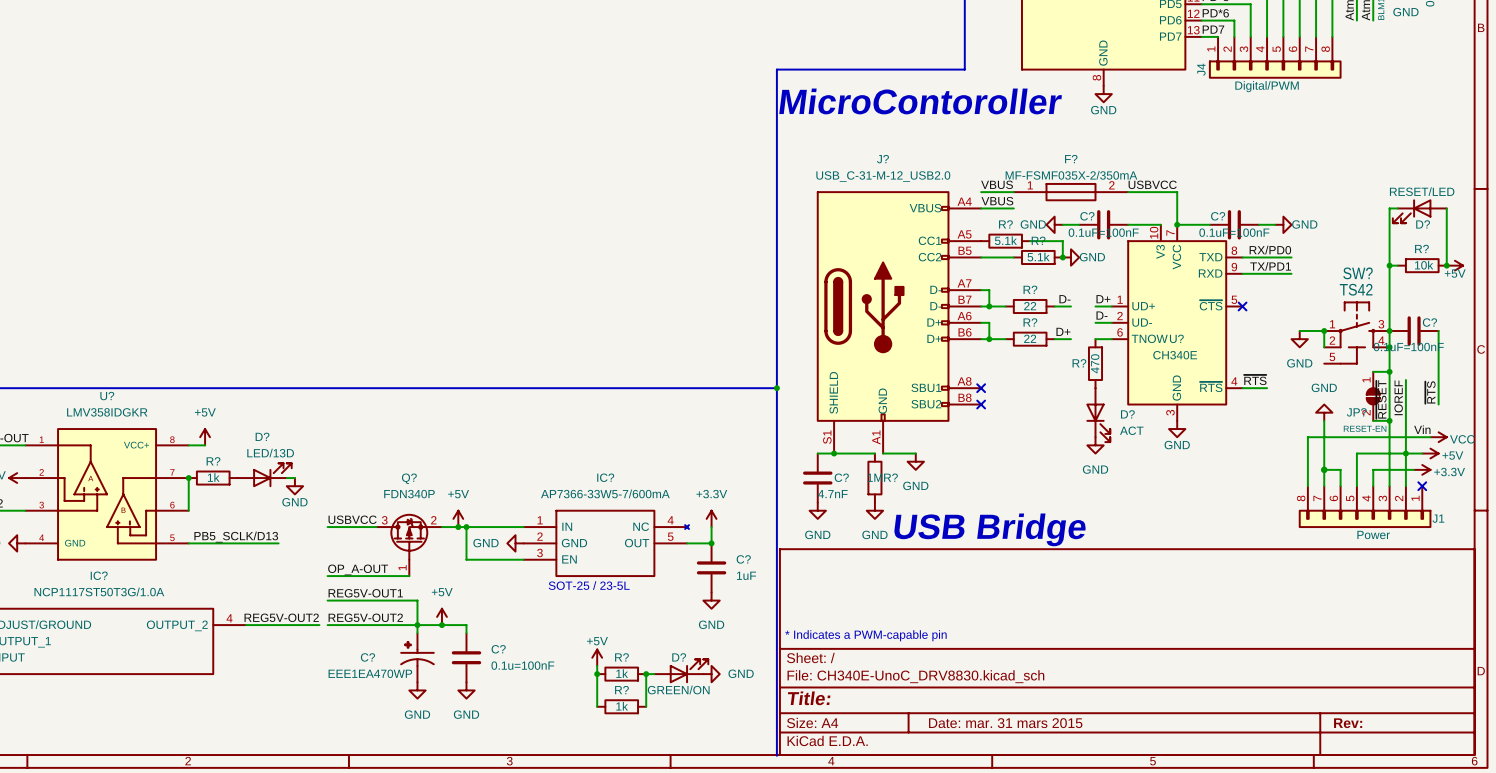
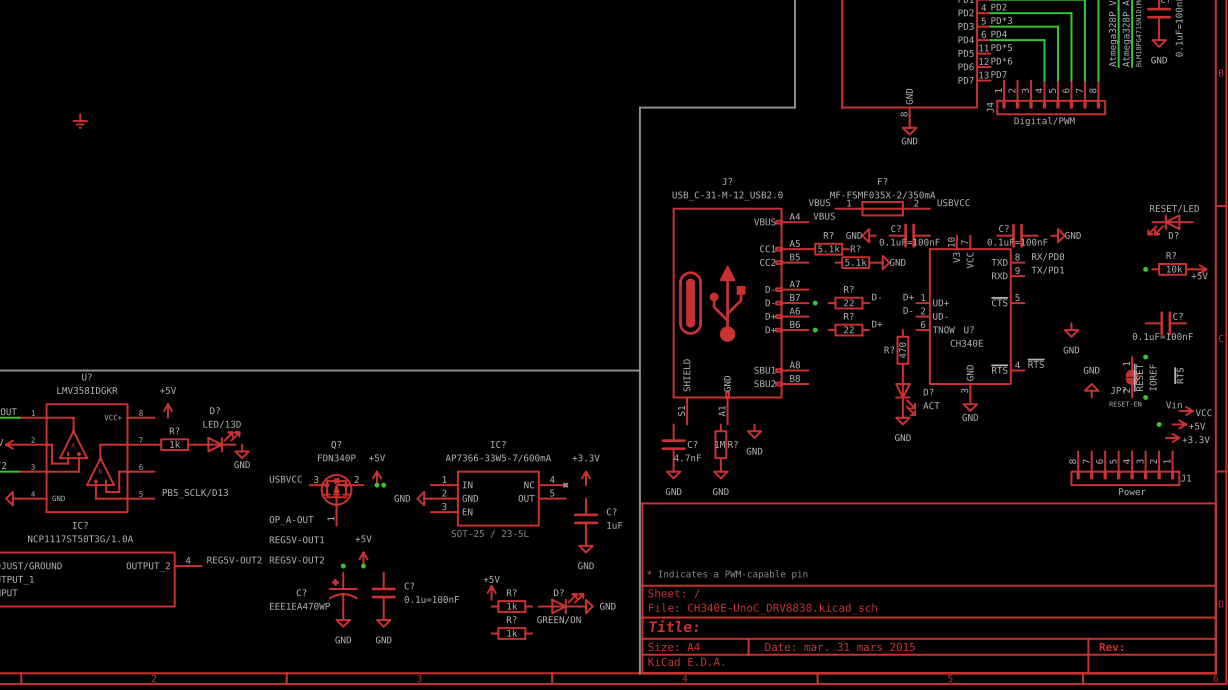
wire: (1201, 4) (1250, 4) (1250, 36) -> none
wire: (1201, 20) (1234, 20) (1234, 36) -> none
wire: (1201, 36) (1218, 36) -> none
power symbol: none -> (80, 121)
text: MicroContoroller (920, 101) -> none
wire: (981, 192) (1013, 192) -> none
wire: (1128, 192) (1177, 192) (1177, 224) (1209, 224) -> none
wire: (981, 208) (1013, 208) -> none
wire: (1397, 208) (1389, 208) (1389, 486) -> none
wire: (1446, 208) (1446, 265) -> none
wire: (1062, 224) (1079, 224) -> none
wire: (1128, 224) (1160, 224) -> none
junction: (1177, 224) -> none
wire: (1258, 224) (1275, 224) -> none
wire: (1030, 241) (1062, 241) (1062, 257) -> none
wire: (981, 257) (1013, 257) -> none
junction: (1062, 257) -> none
wire: (1242, 257) (1291, 257) -> none
wire: (1389, 265) (1397, 265) -> none
junction: (1446, 265) -> none
wire: (1242, 273) (1291, 273) -> none
wire: (981, 290) (989, 290) (989, 306) -> none
wire: (981, 306) (1005, 306) -> none
wire: (1054, 306) (1071, 306) -> none
wire: (1095, 306) (1111, 306) -> none
no-connect mark: (1242, 306) -> none
wire: (981, 322) (989, 322) (989, 339) -> none
wire: (1095, 322) (1111, 322) -> none
wire: (1299, 331) (1324, 331) (1324, 347) -> none
junction: (1324, 331) -> none
junction: (1389, 331) -> none
wire: (1438, 331) (1438, 404) -> none
SW?: TS42 (1356, 332) -> none
wire: (981, 339) (1005, 339) -> none
wire: (1054, 339) (1071, 339) -> none
wire: (1095, 339) (1111, 339) -> none
junction: (1389, 347) -> none
wire: (1373, 371) (1389, 371) -> none
wire: (1405, 380) (1405, 486) -> none
junction: (776, 388) -> none
no-connect mark: (981, 388) -> none
wire: (1242, 388) (1267, 388) -> none
no-connect mark: (981, 404) -> none
wire: (1324, 420) (1324, 486) -> none
wire: (1373, 420) (1389, 420) -> none
wire: (1430, 437) (1307, 437) (1307, 486) -> none
wire: (188, 445) (205, 445) -> none
wire: (817, 453) (874, 453) -> none
junction: (834, 453) -> none
wire: (883, 453) (915, 453) -> none
wire: (1422, 453) (1356, 453) (1356, 486) -> none
wire: (1324, 469) (1340, 469) (1340, 486) -> none
junction: (1324, 469) -> none
wire: (1414, 469) (1373, 469) (1373, 486) -> none
wire: (188, 478) (188, 510) -> none
junction: (188, 478) -> none
wire: (286, 478) (294, 478) -> none
no-connect mark: (1422, 486) -> none
wire: (327, 527) (376, 527) -> none
wire: (441, 527) (523, 527) -> none
wire: (466, 527) (466, 559) (523, 559) -> none
wire: (711, 527) (711, 543) (687, 543) -> none
text: USB Bridge (990, 529) -> none
wire: (188, 543) (278, 543) -> none
junction: (711, 543) -> none
wire: (327, 576) (409, 576) -> none
wire: (327, 600) (417, 600) (417, 633) -> none
wire: (245, 625) (319, 625) -> none
wire: (327, 625) (466, 625) (466, 633) -> none
wire: (597, 665) (597, 706) -> none
junction: (597, 674) -> none
junction: (646, 674) -> none
wire: (654, 674) (646, 674) (646, 706) -> none

